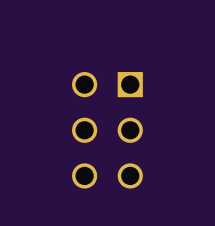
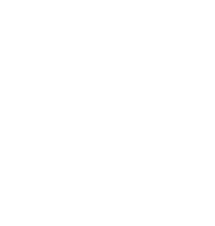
part: (107, 130) -> none

